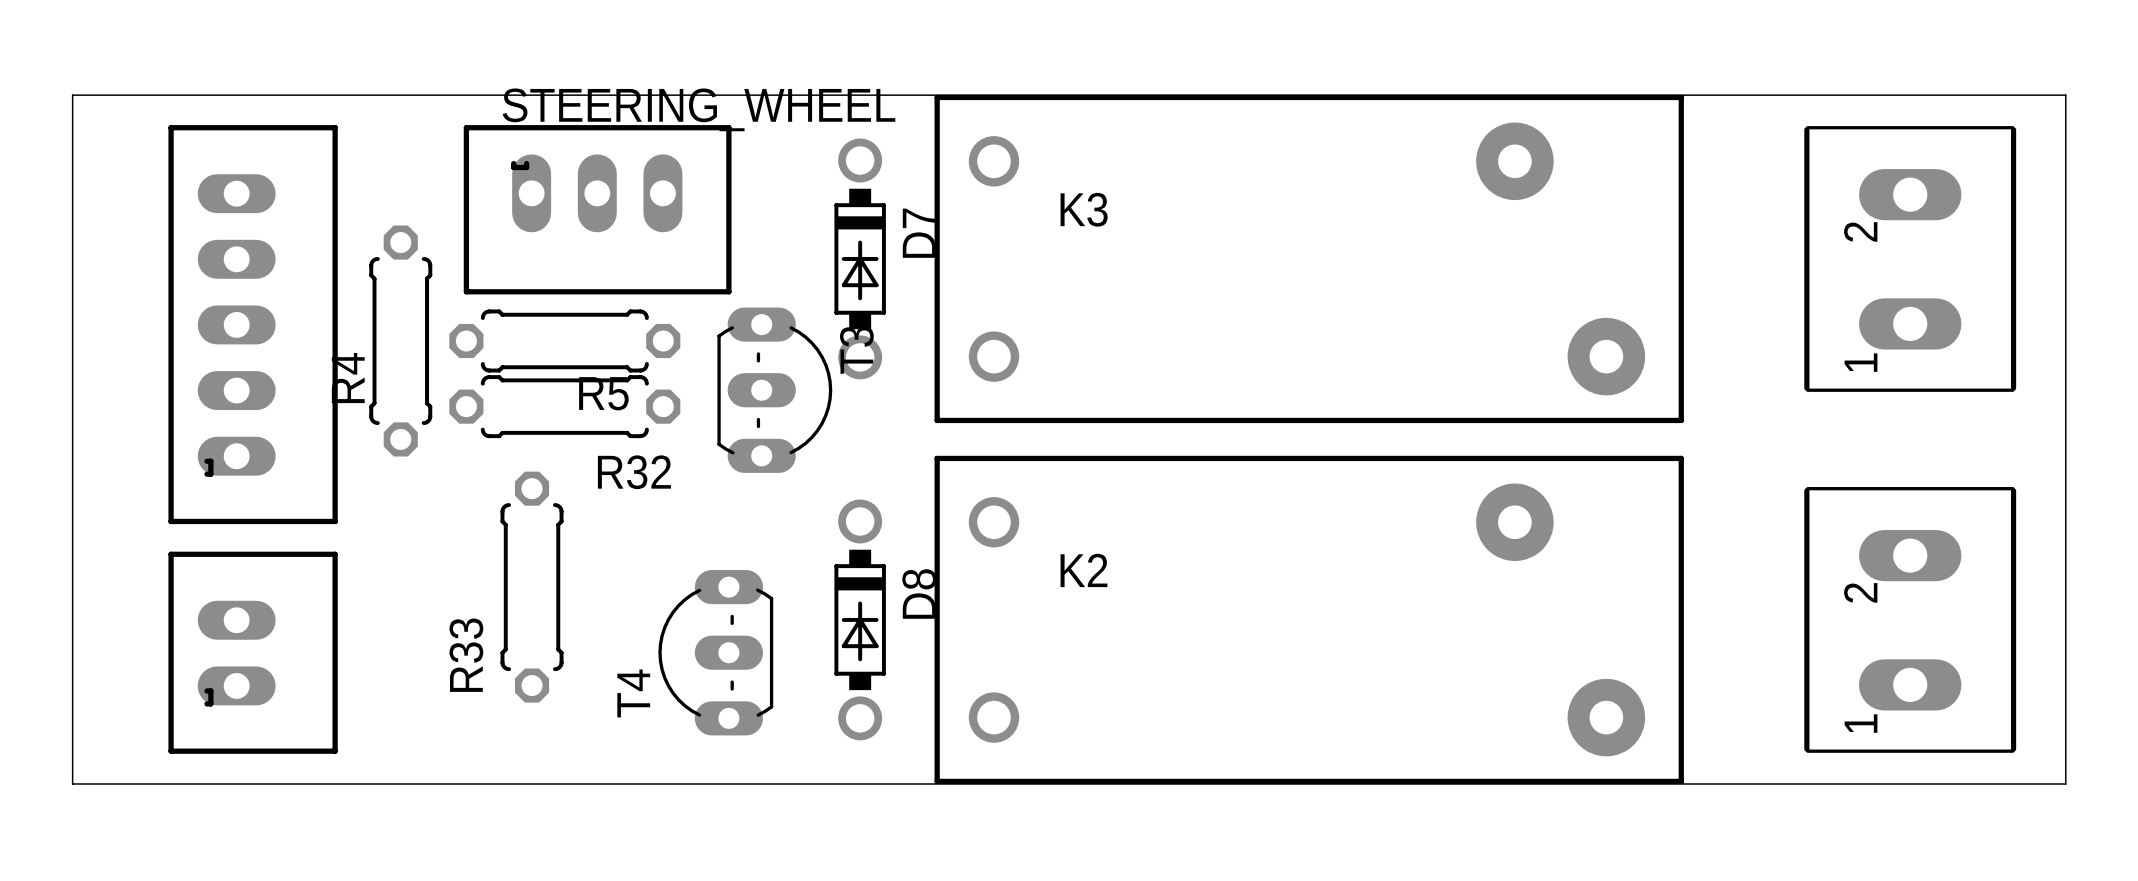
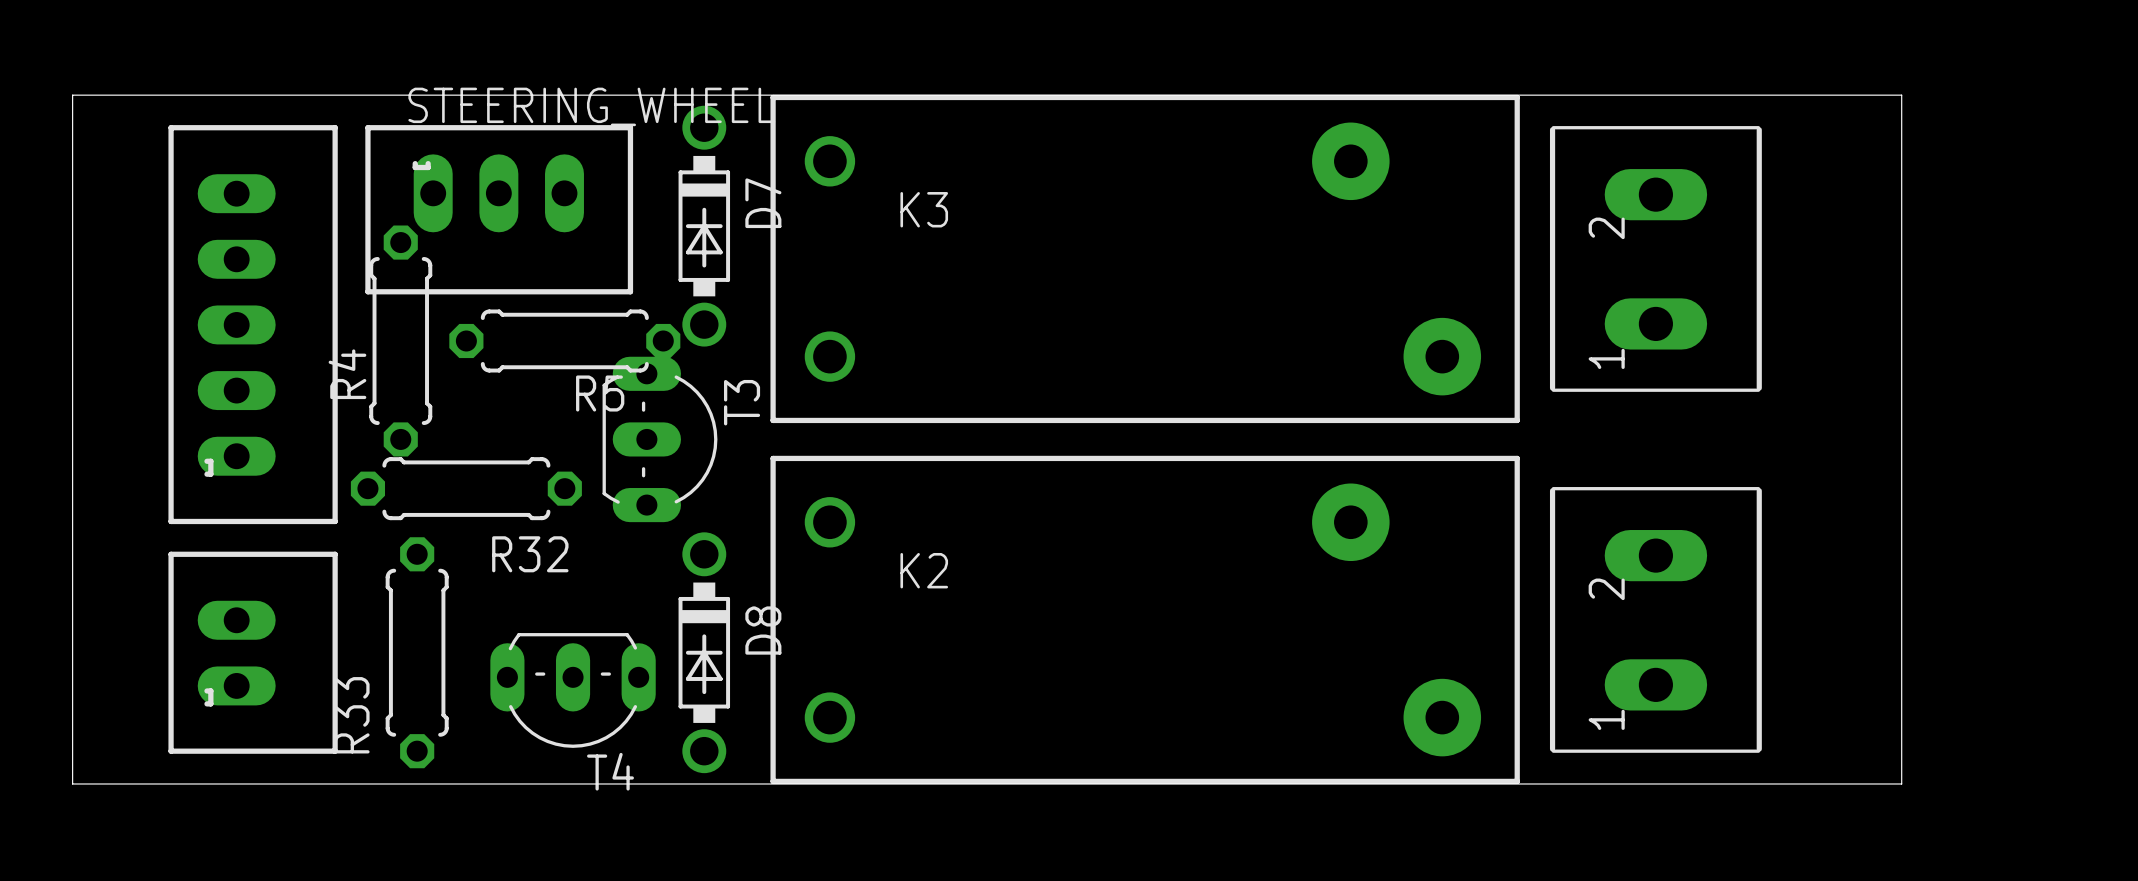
board edge: (1901, 95) (2065, 95) (2065, 783) (1901, 783) -> (1901, 95) (1901, 783)
STEERING_WHEEL position: (597, 209) -> (499, 209)
D7 position: (860, 258) -> (704, 226)
K3 position: (1309, 258) -> (1145, 258)
part: none -> (1655, 258)
part: (1910, 258) -> none
T3 position: (774, 390) -> (659, 439)
R32 position: (564, 406) -> (466, 488)
T4 footprint: [658, 570, 774, 736] -> [490, 633, 656, 748]
R33 position: (532, 587) -> (417, 652)
D8 position: (860, 619) -> (704, 652)
K2 position: (1309, 619) -> (1145, 619)
part: none -> (1655, 619)
part: (1910, 619) -> none
T4 name position: T4 (633, 693) -> T4 (610, 771)

